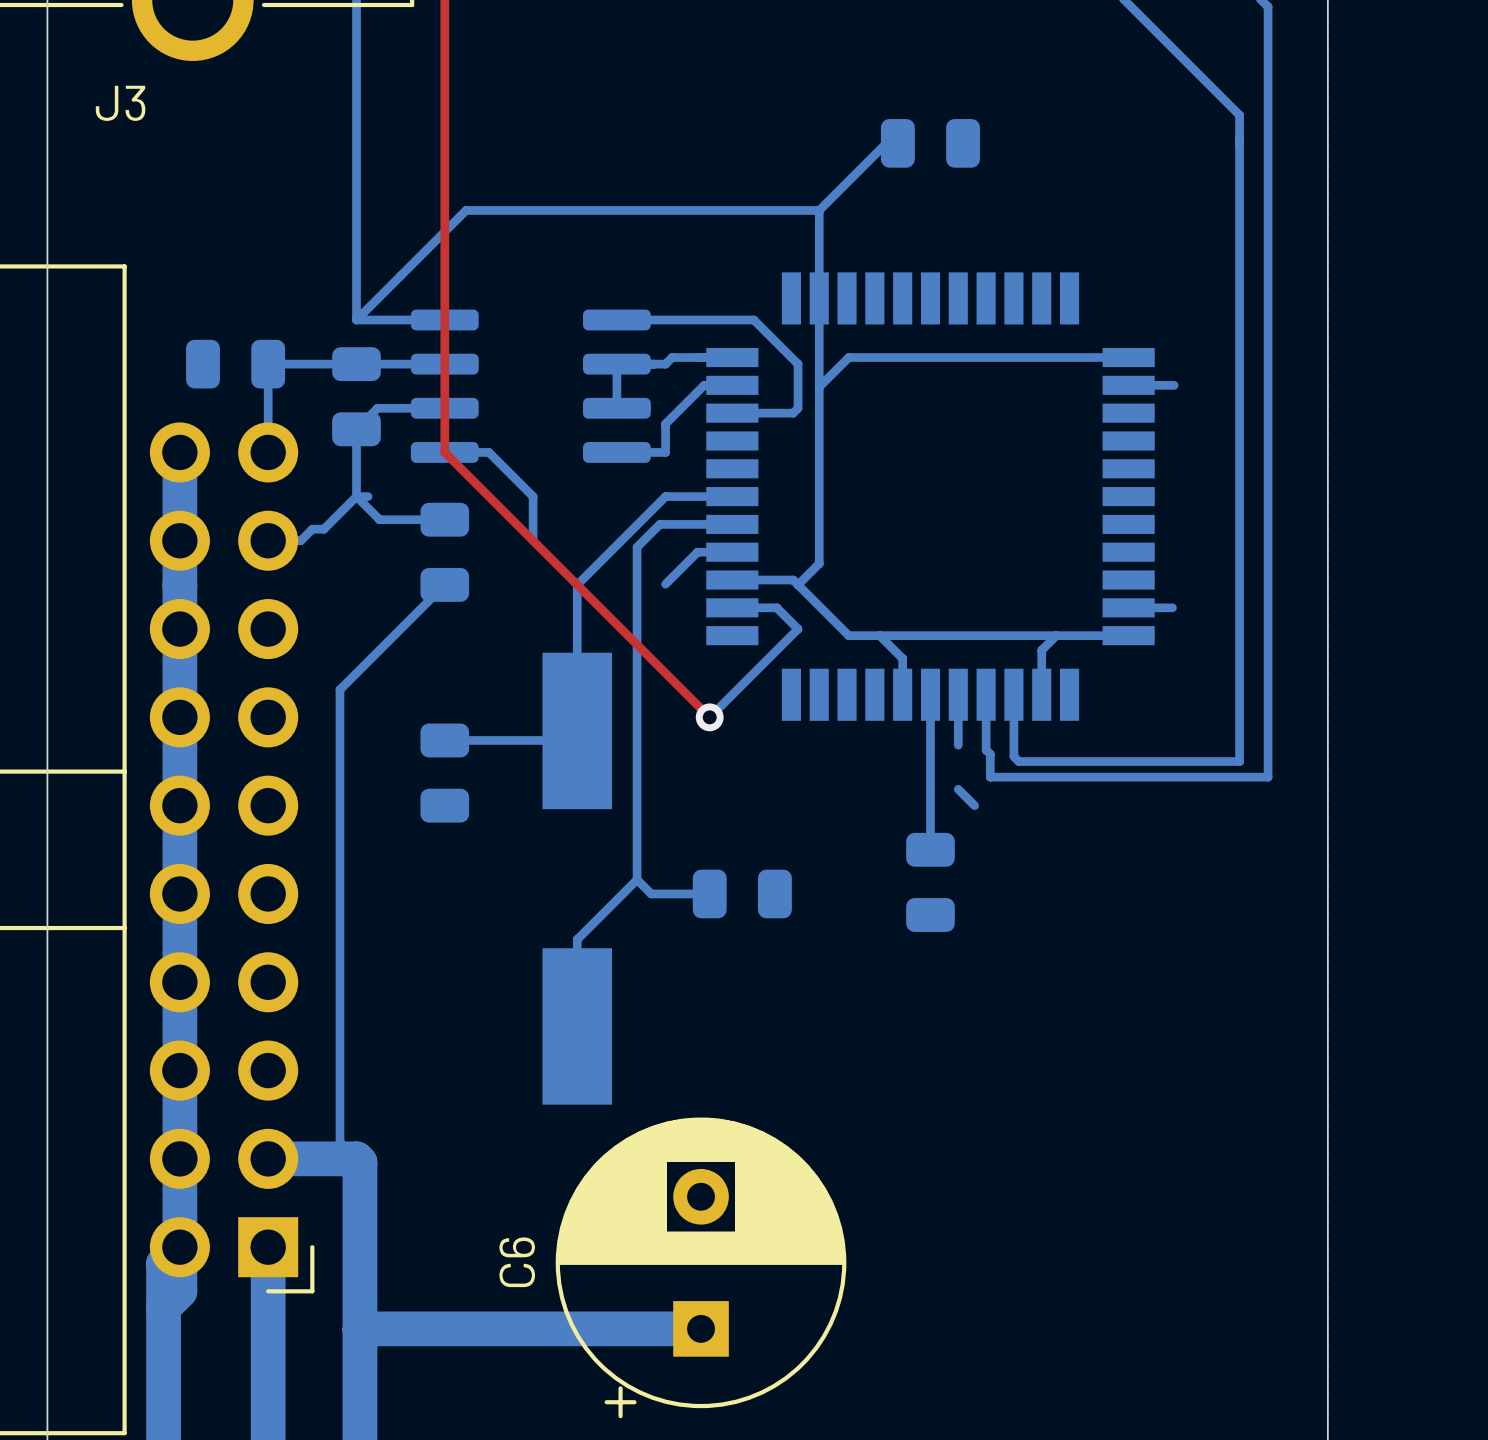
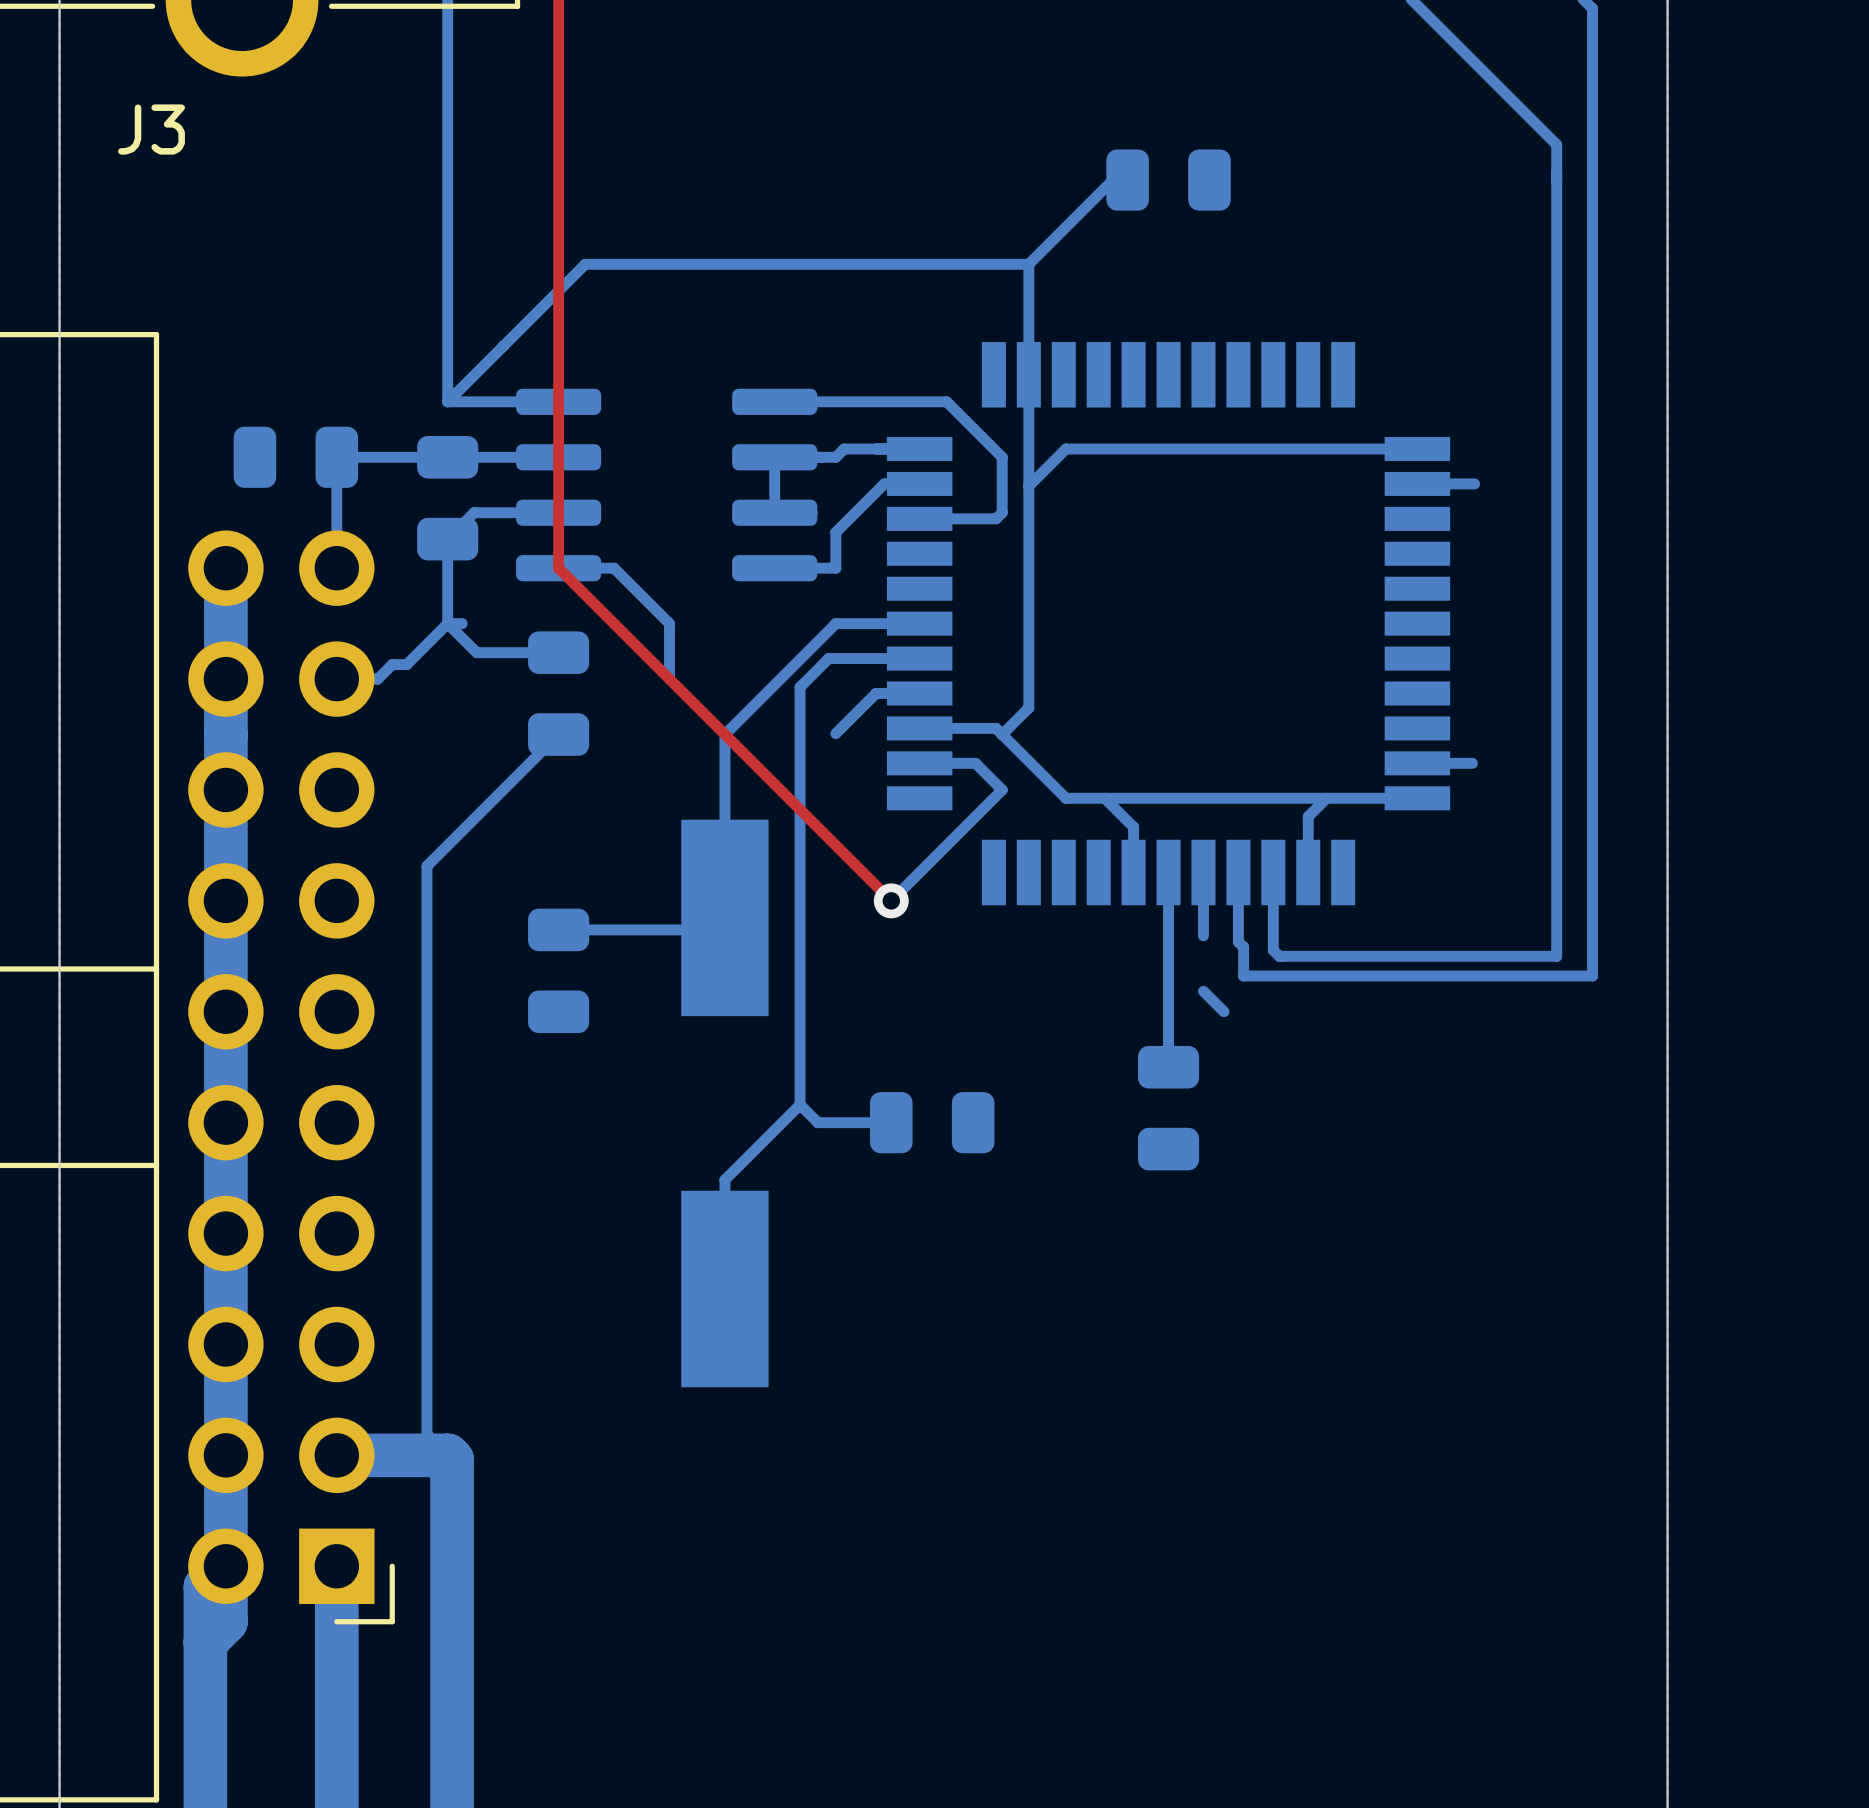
C6: (701, 1267) -> none
bottom track: (701, 1328) (359, 1329) -> none

